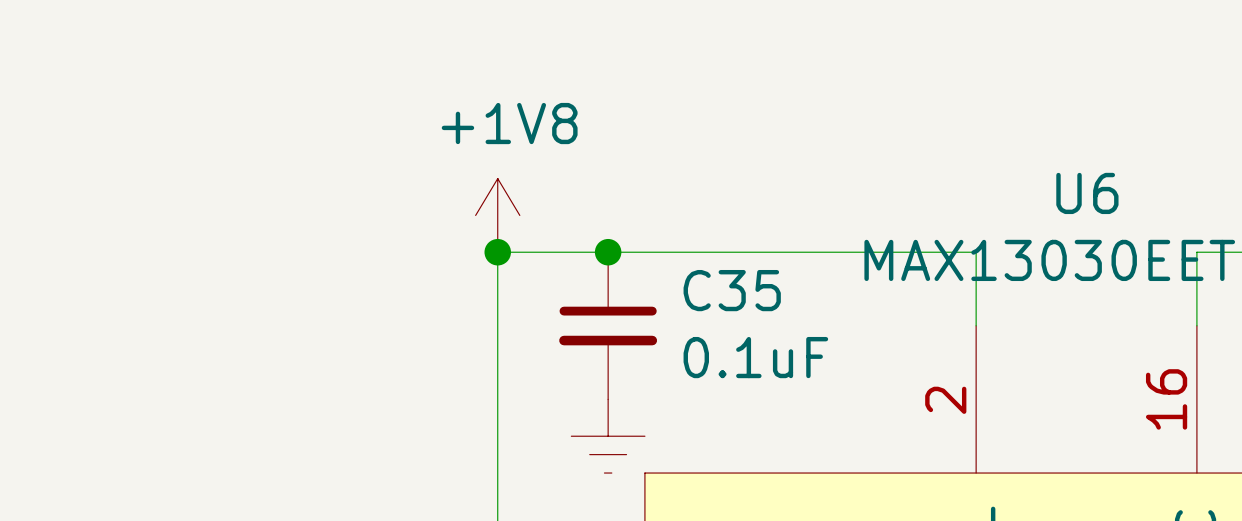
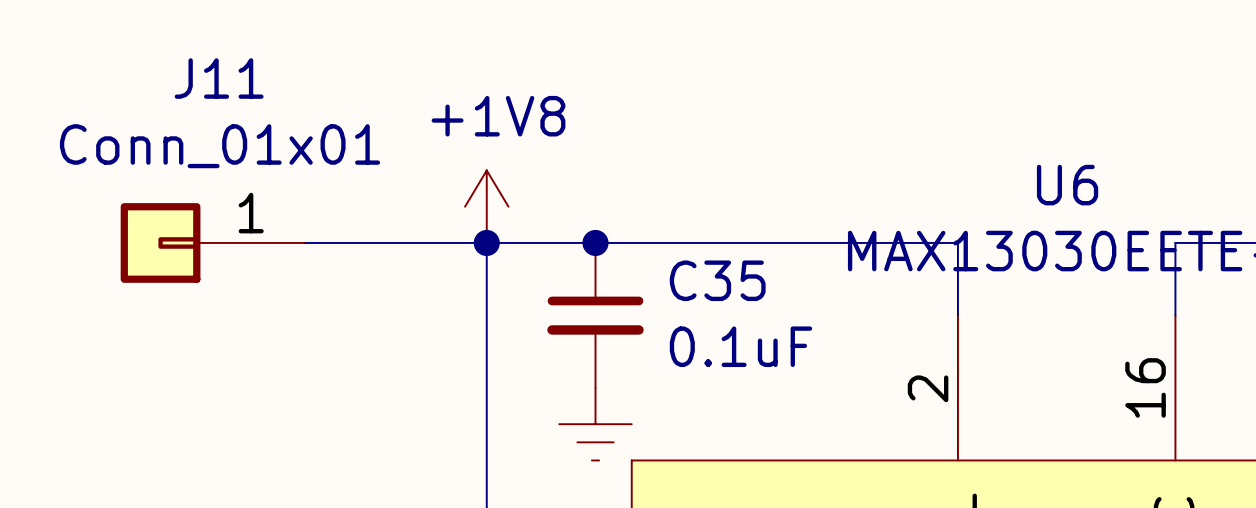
J11: none -> Conn_01x01 (213, 242)
wire: none -> (305, 242) (486, 242)

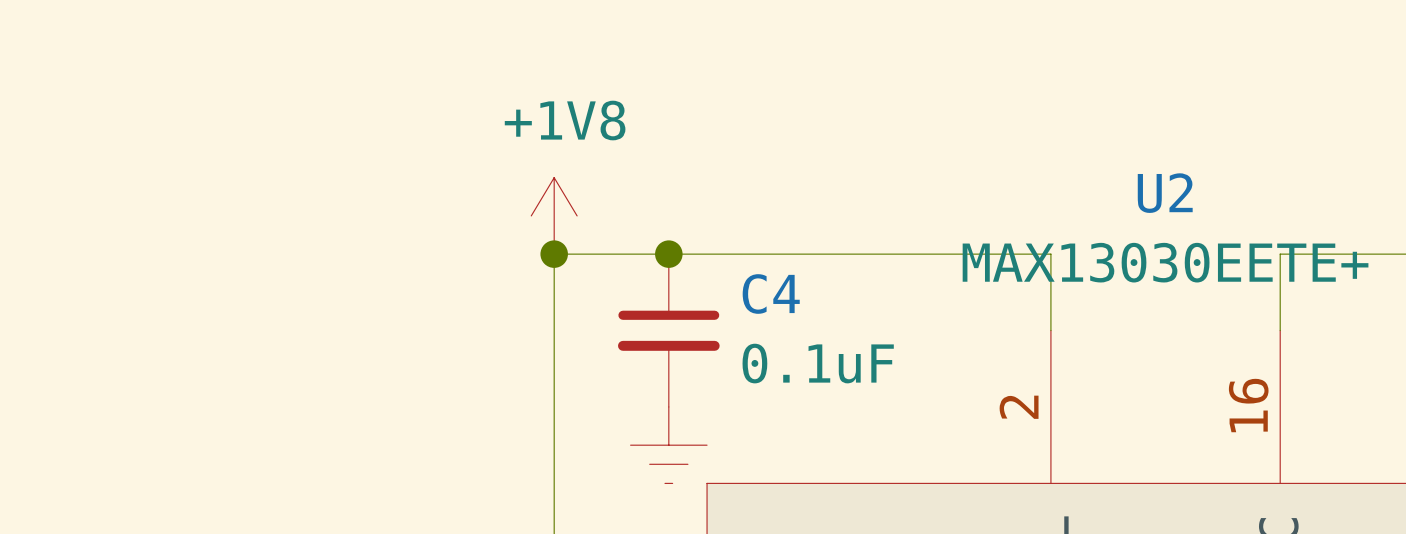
U6 name: U6 (1067, 185) -> U2 (1165, 193)
J11: Conn_01x01 (213, 242) -> none
wire: (305, 242) (486, 242) -> none
C35 name: C35 (717, 280) -> C4 (771, 294)

